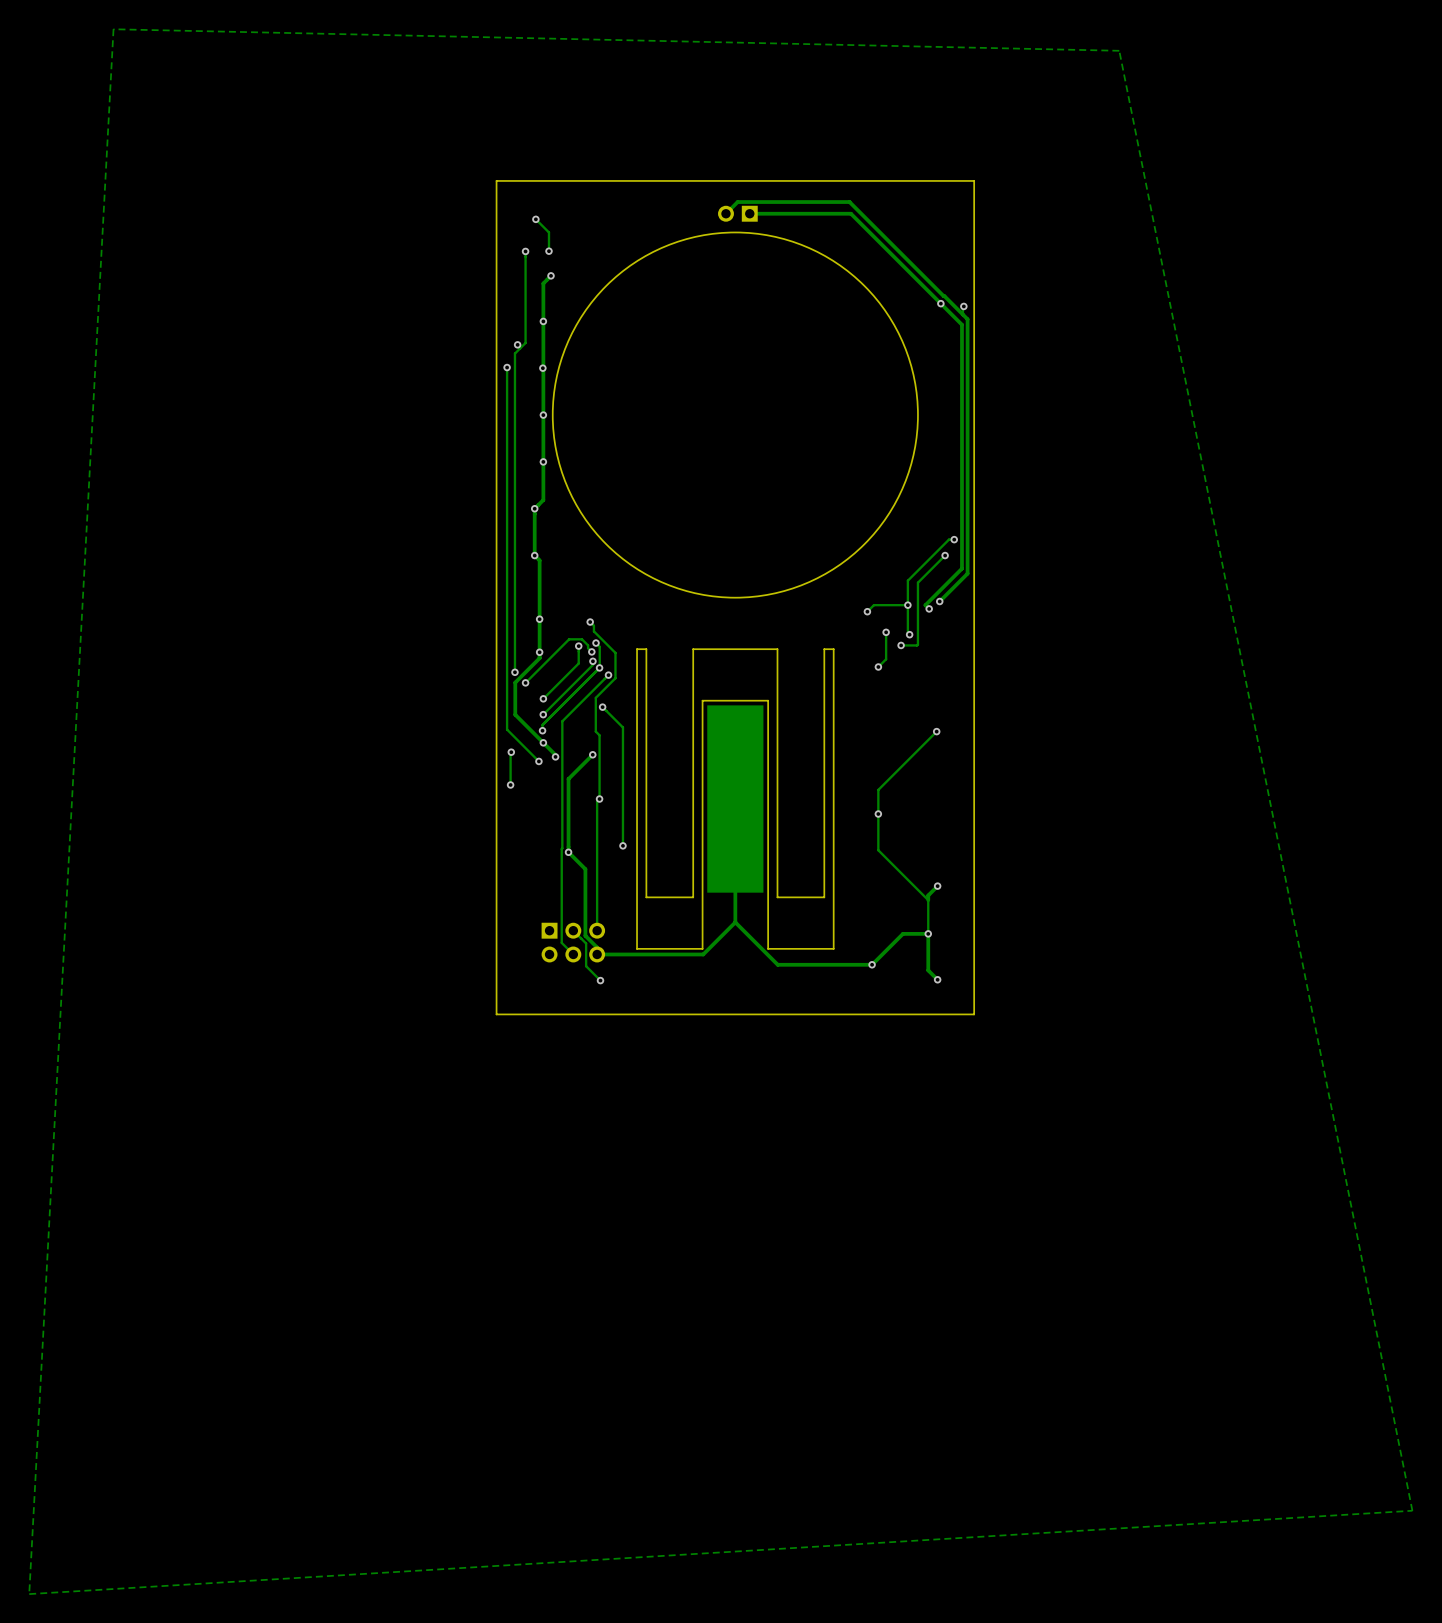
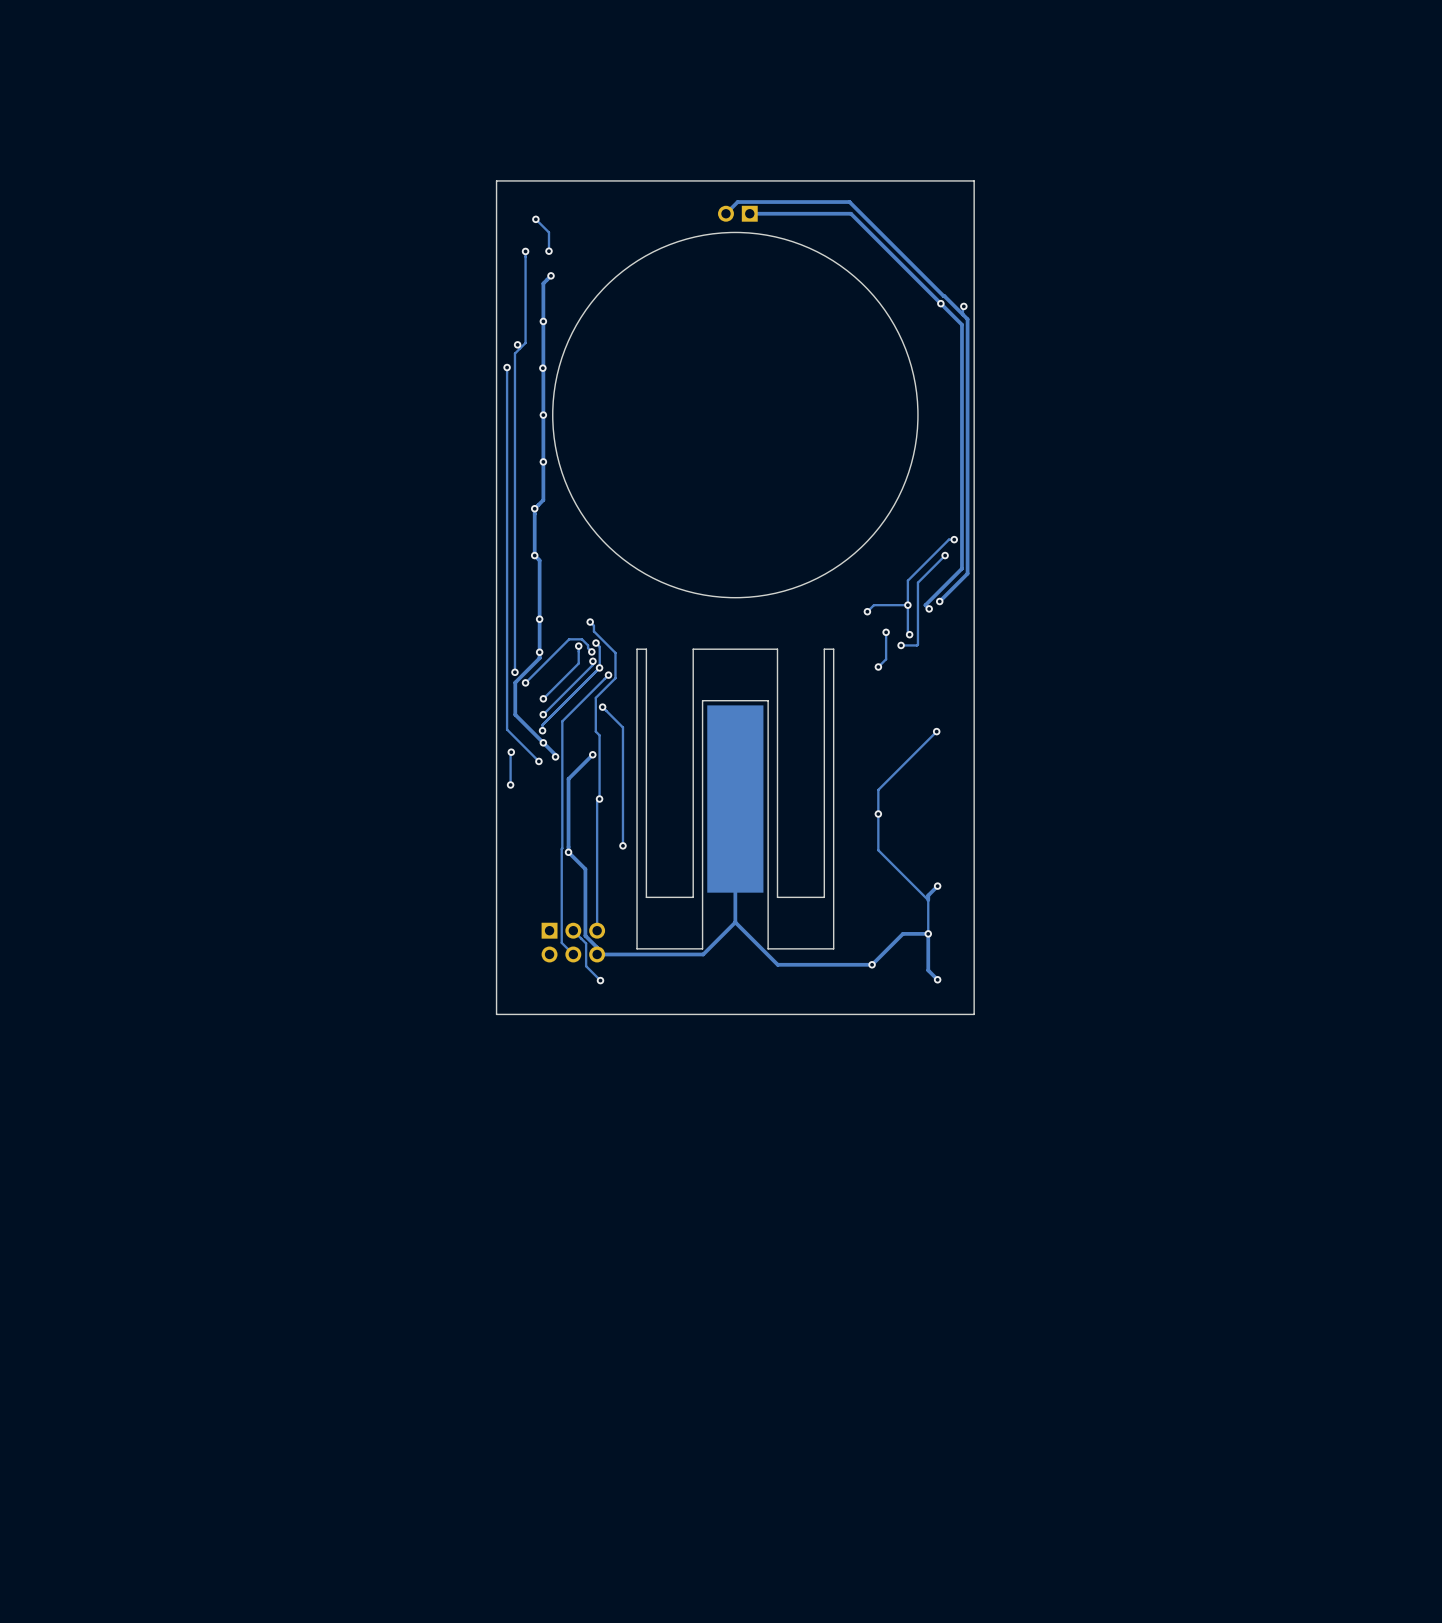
zone outline: (113, 29) (1119, 50) (1412, 1510) (29, 1594) (113, 29) -> none

